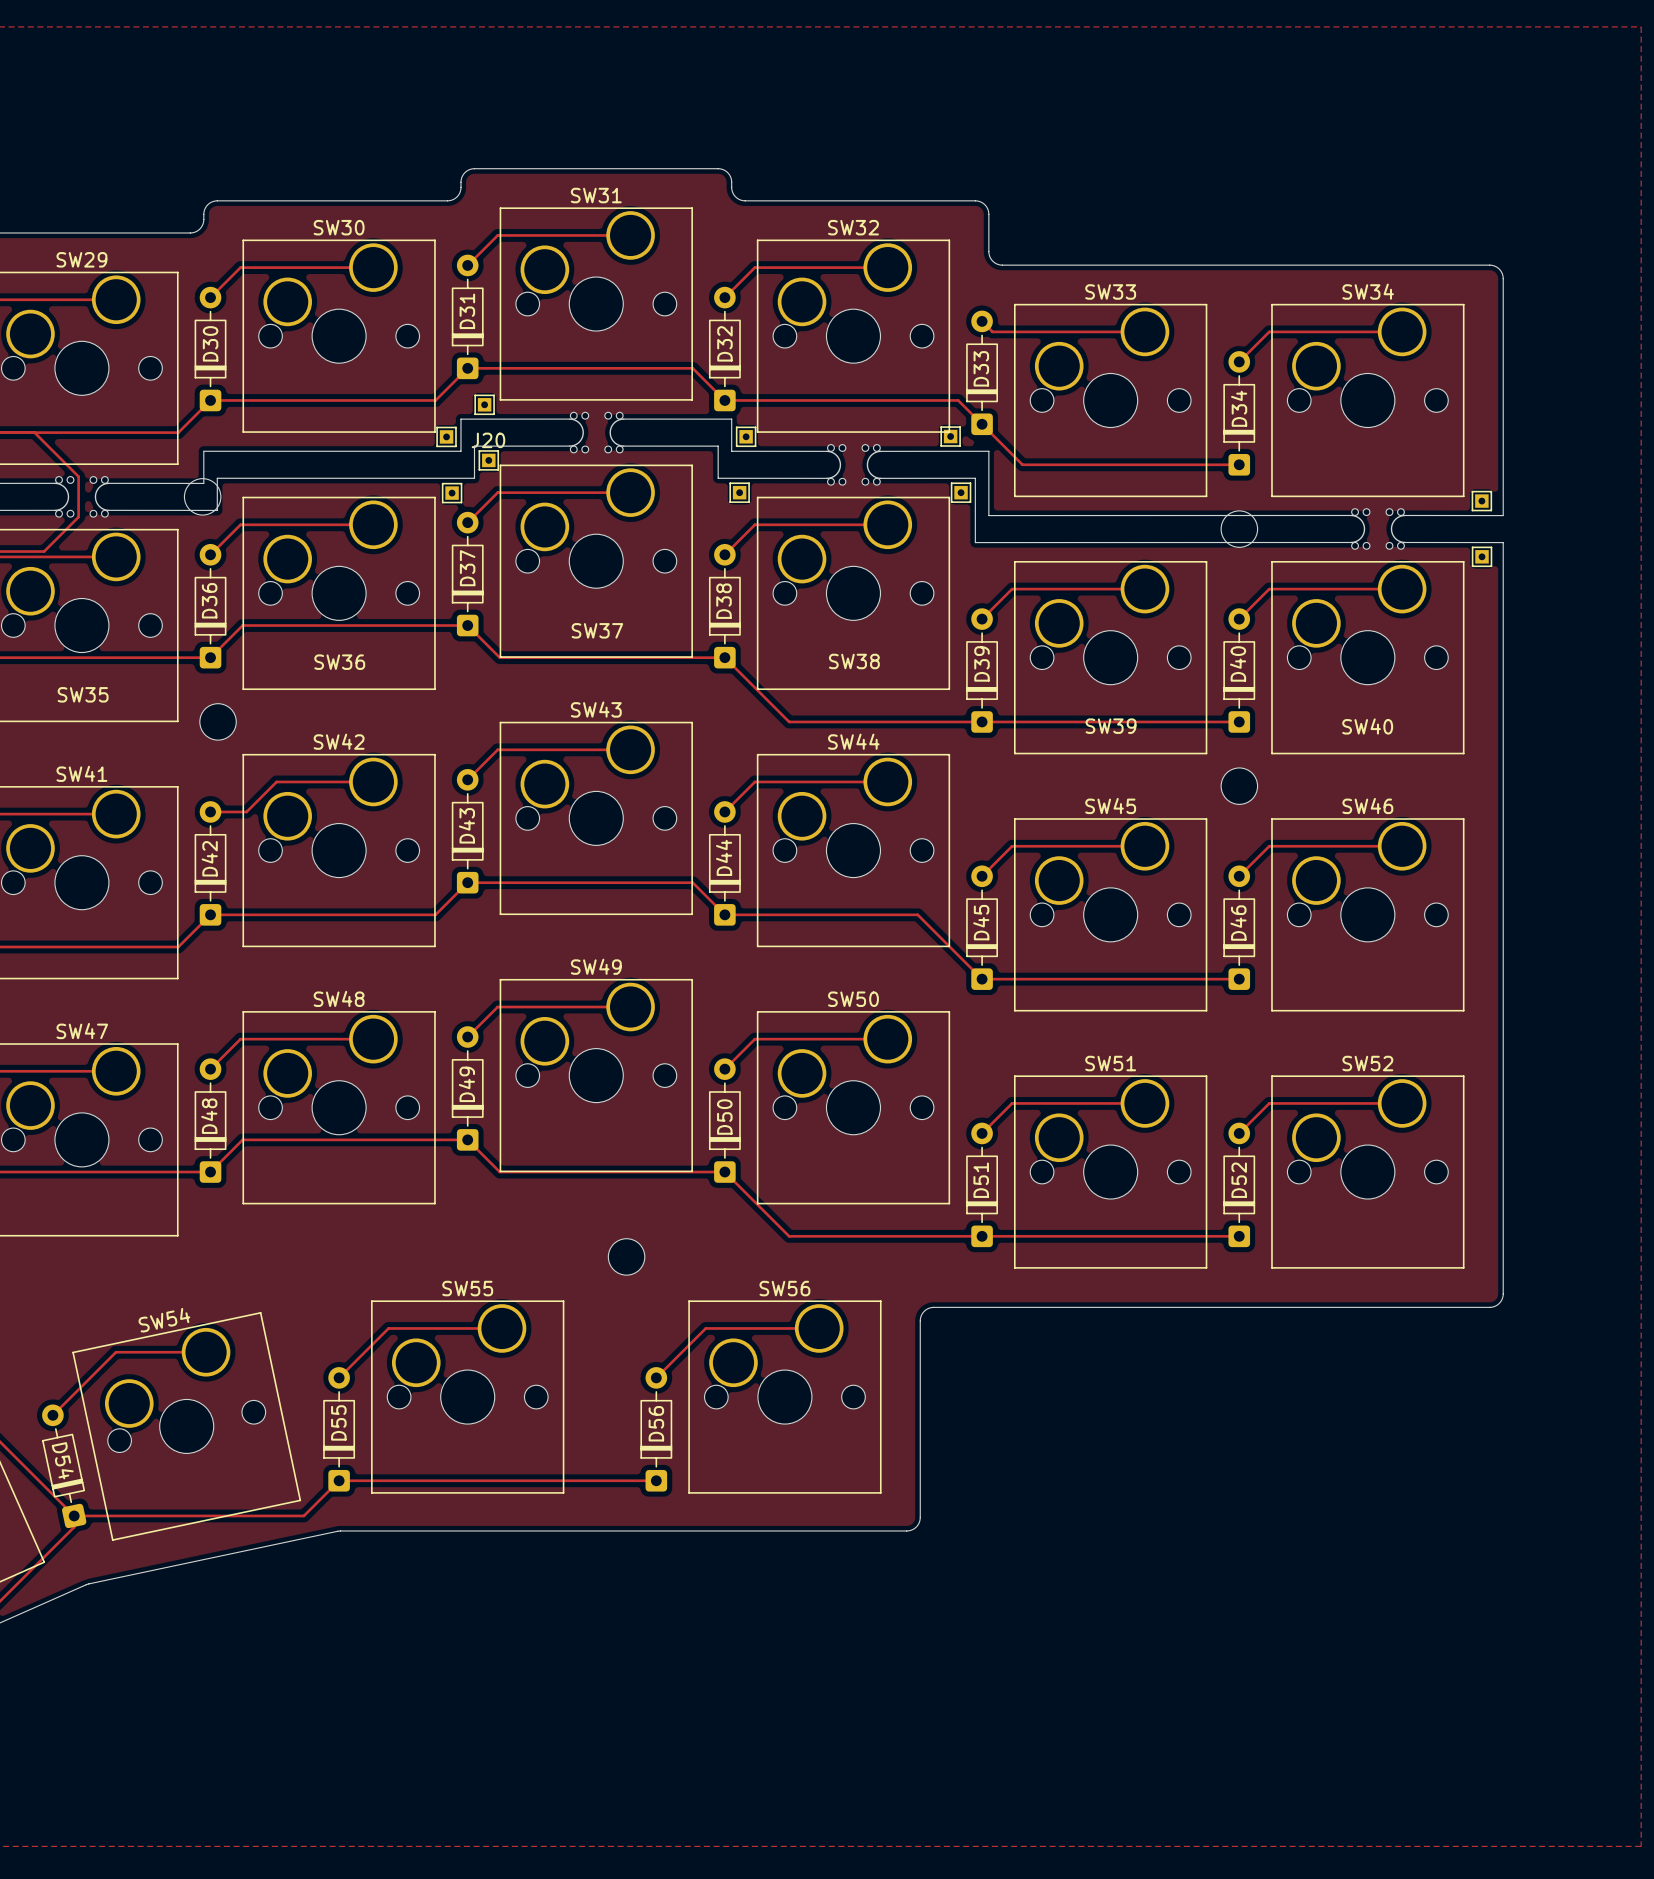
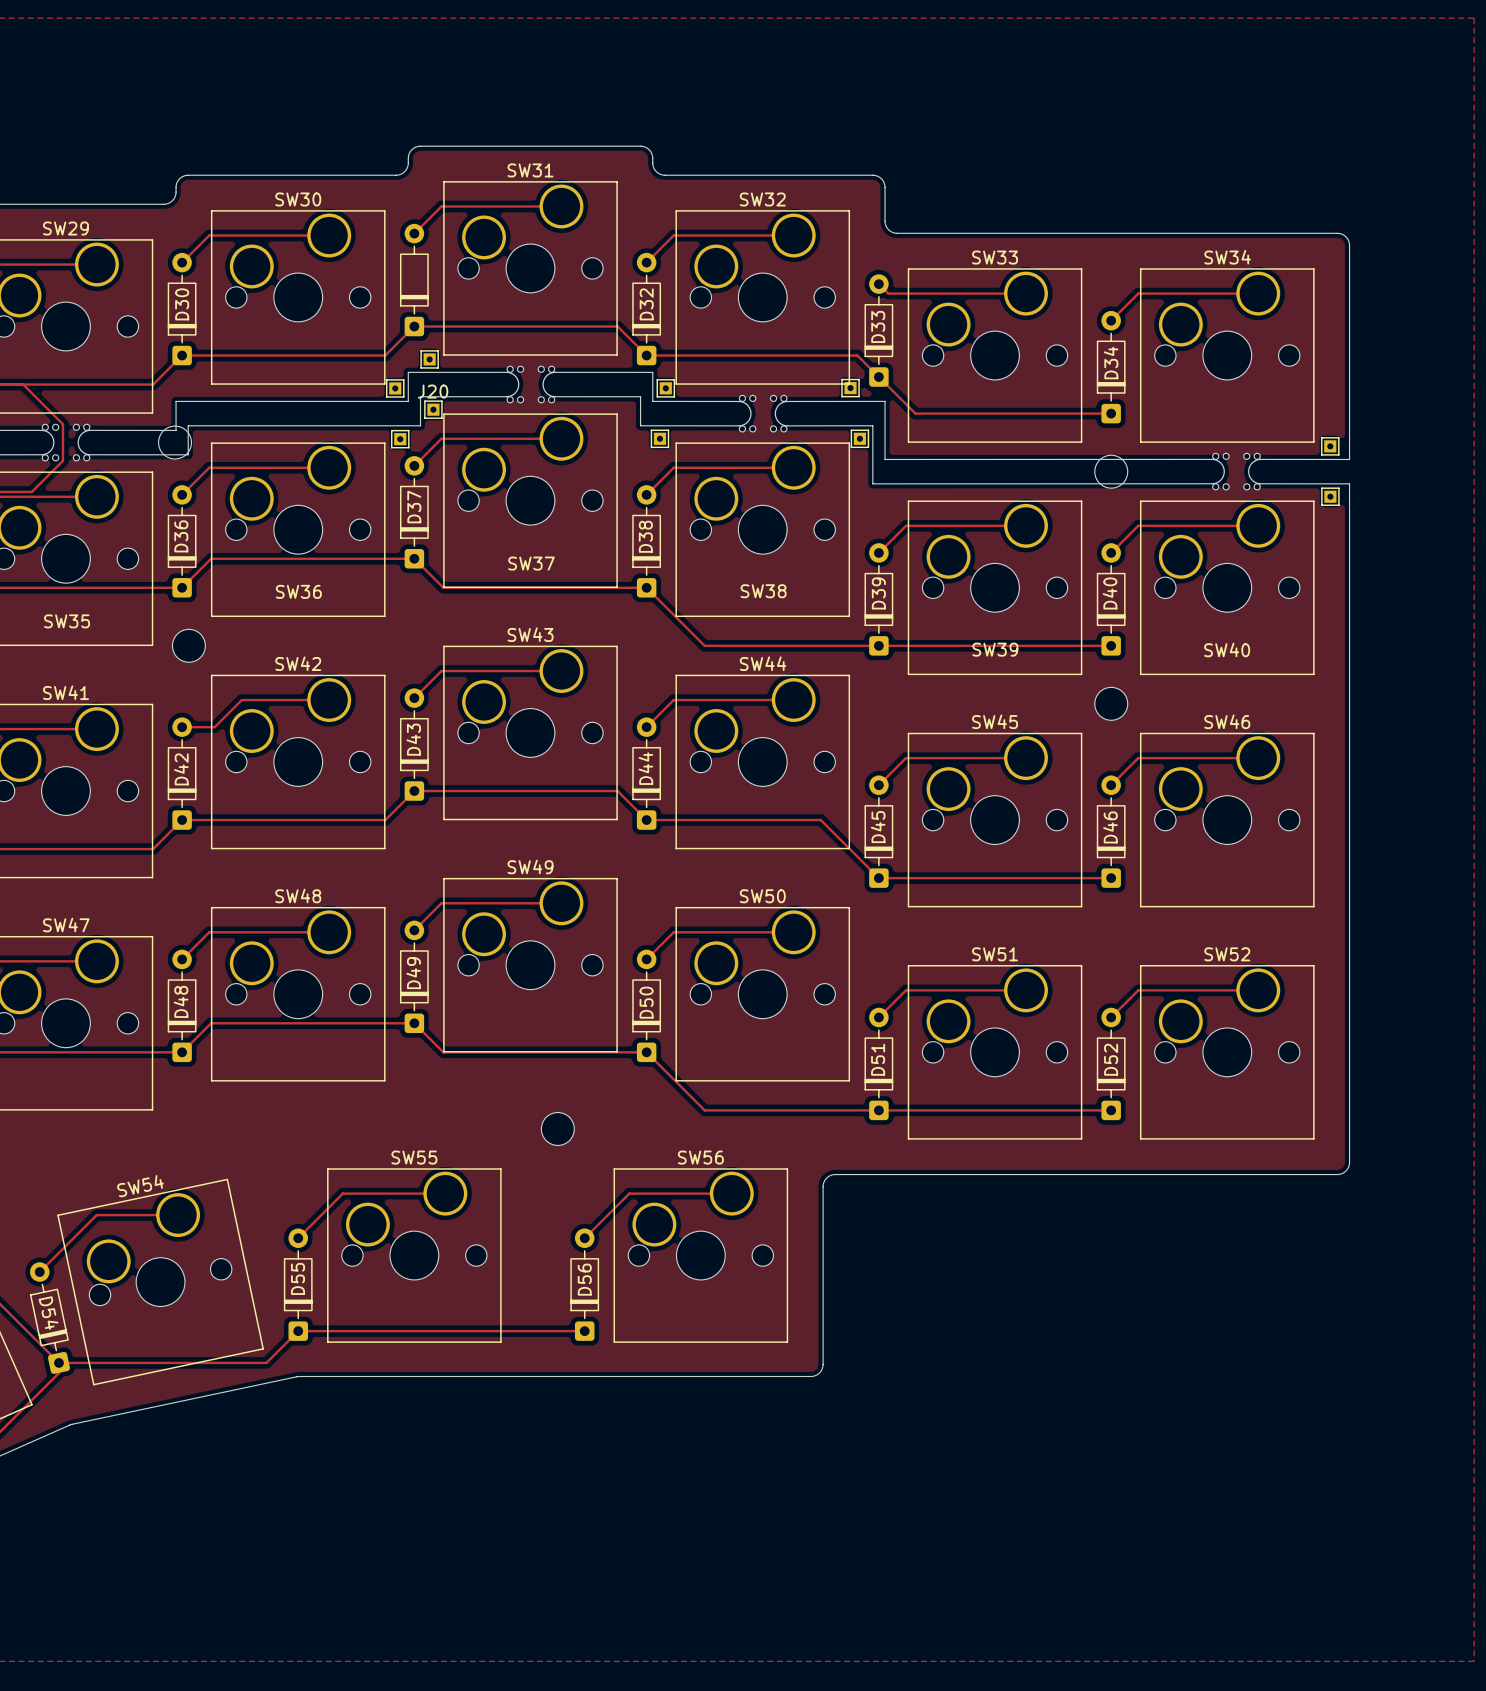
D31 name: D31 (467, 311) -> none

